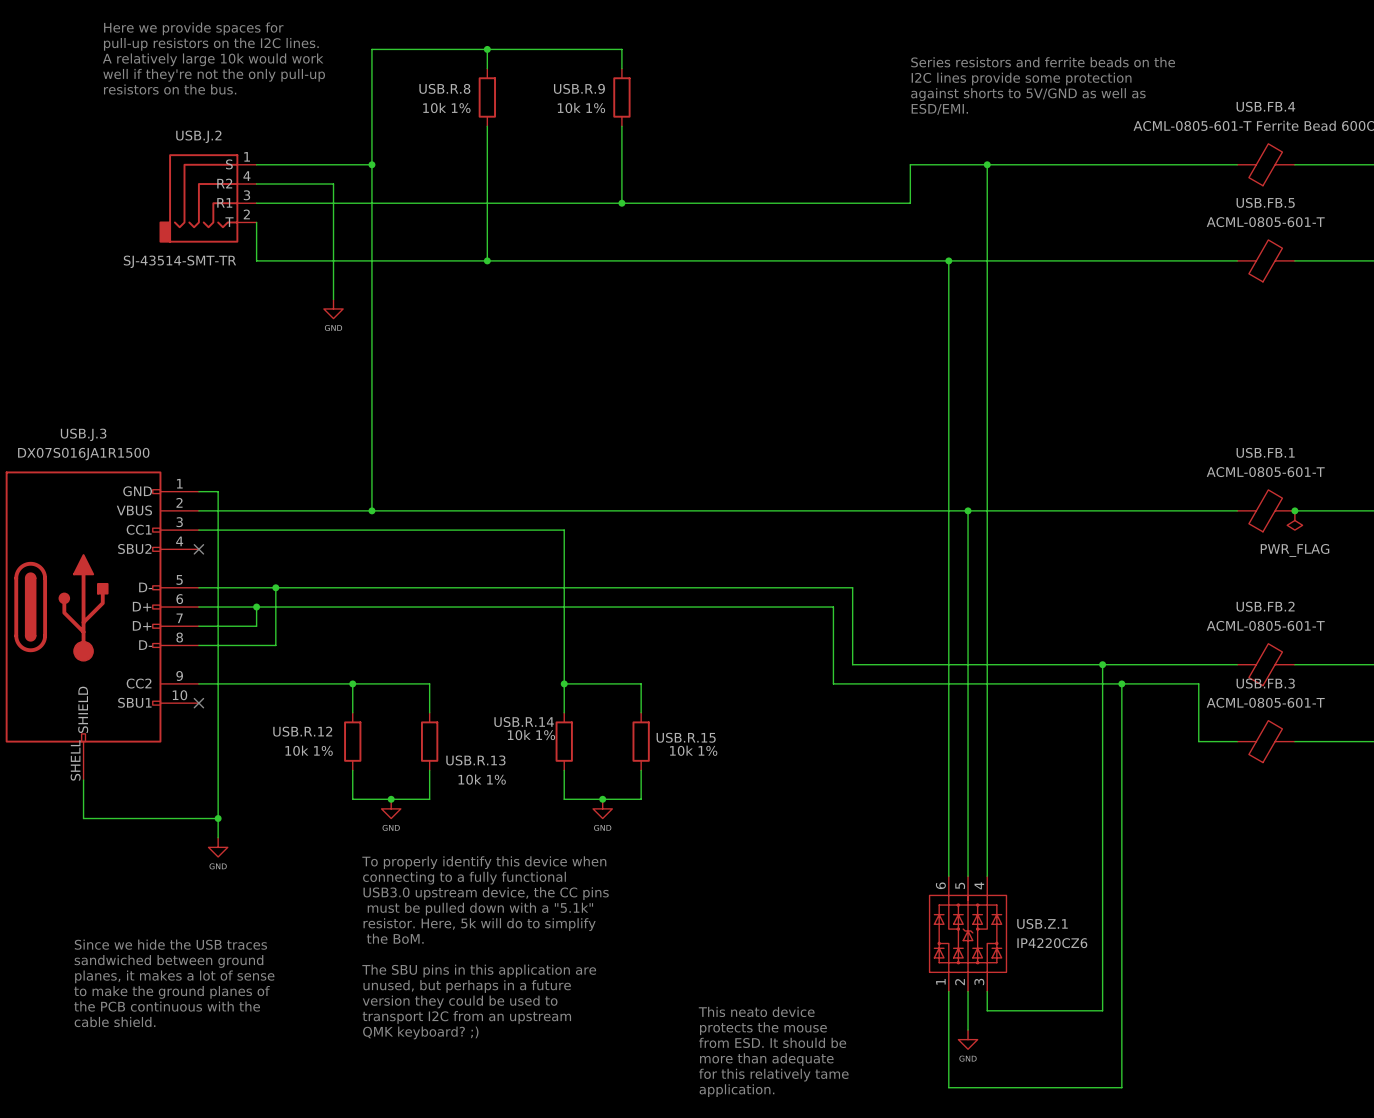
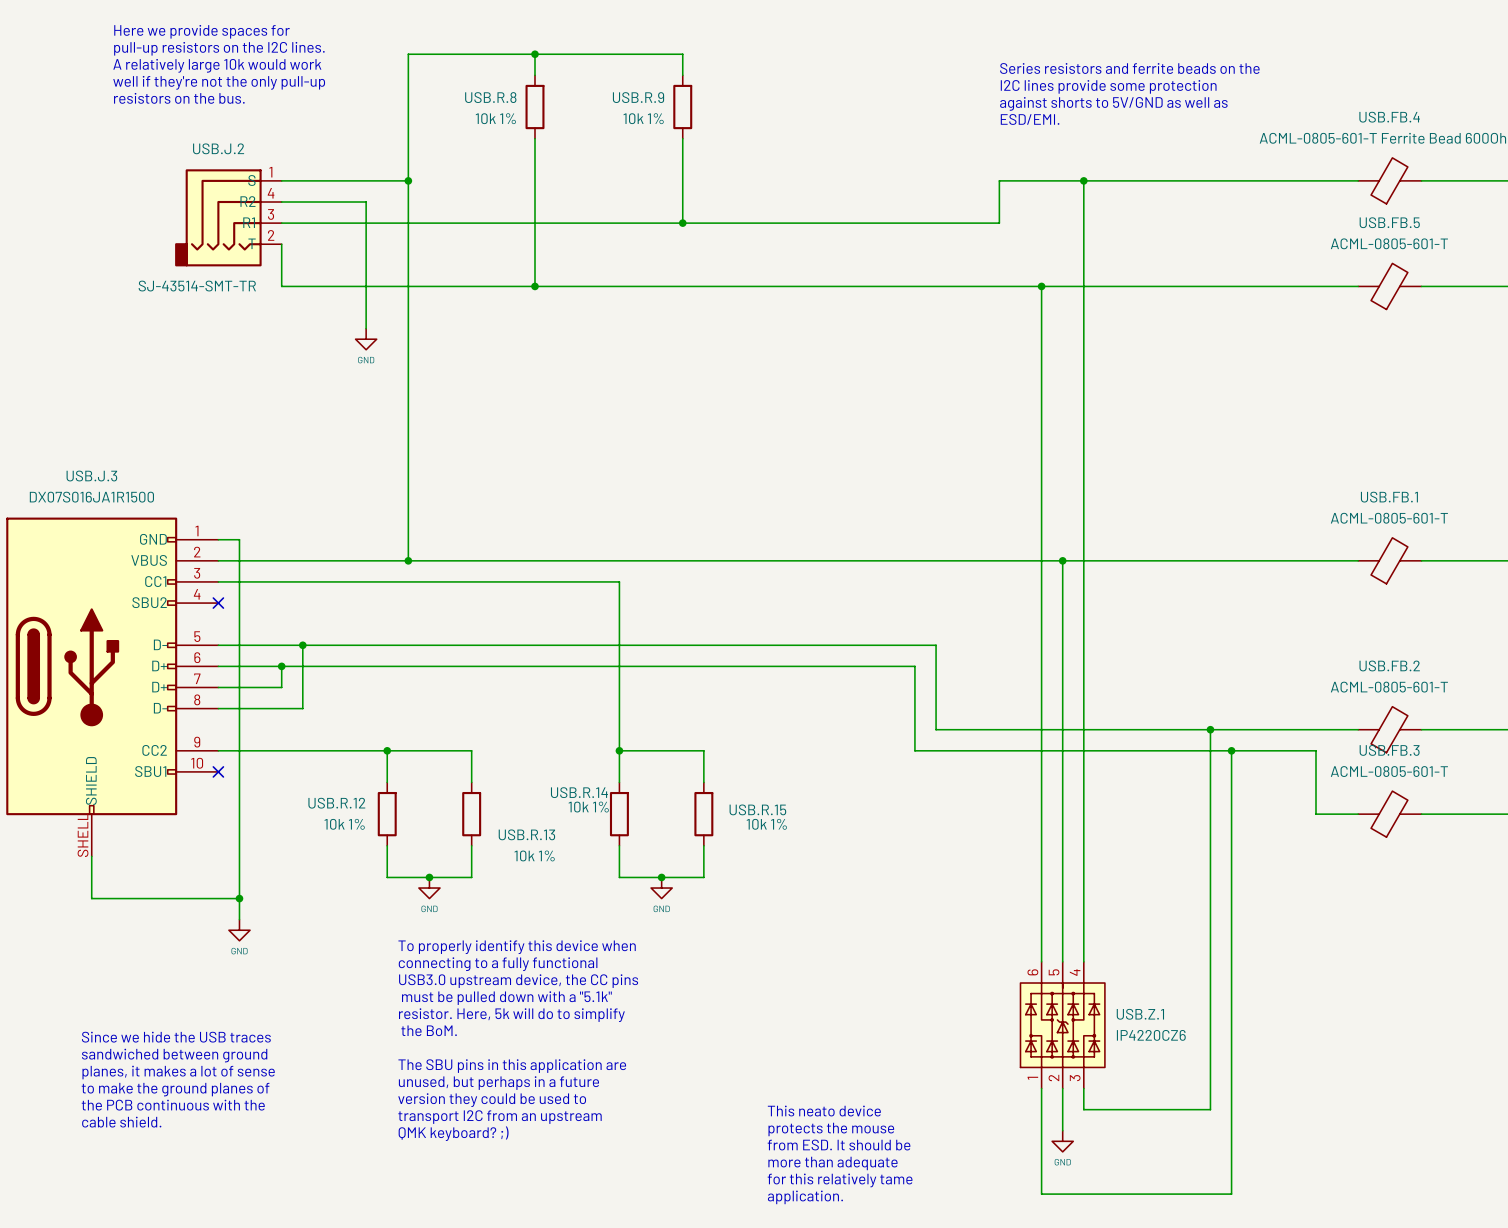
junction: (1294, 510) -> none
power symbol: PWR_FLAG (1294, 520) -> none

